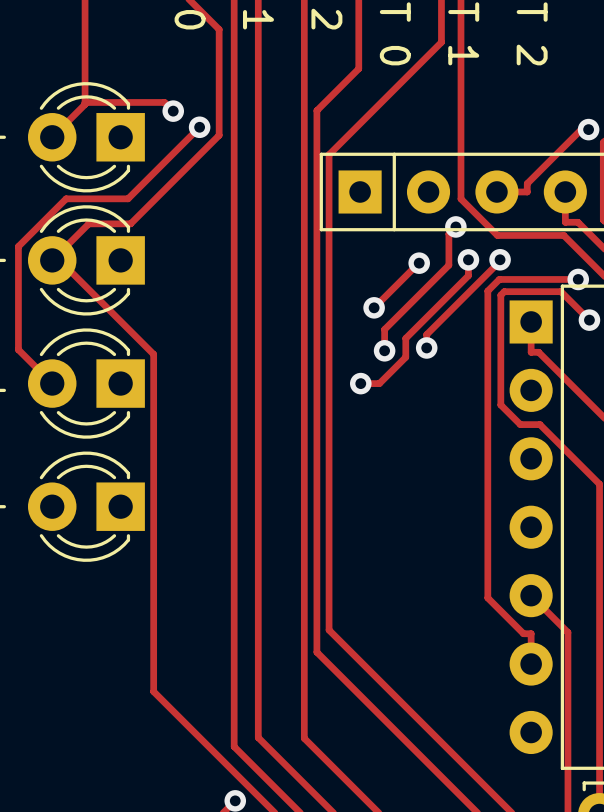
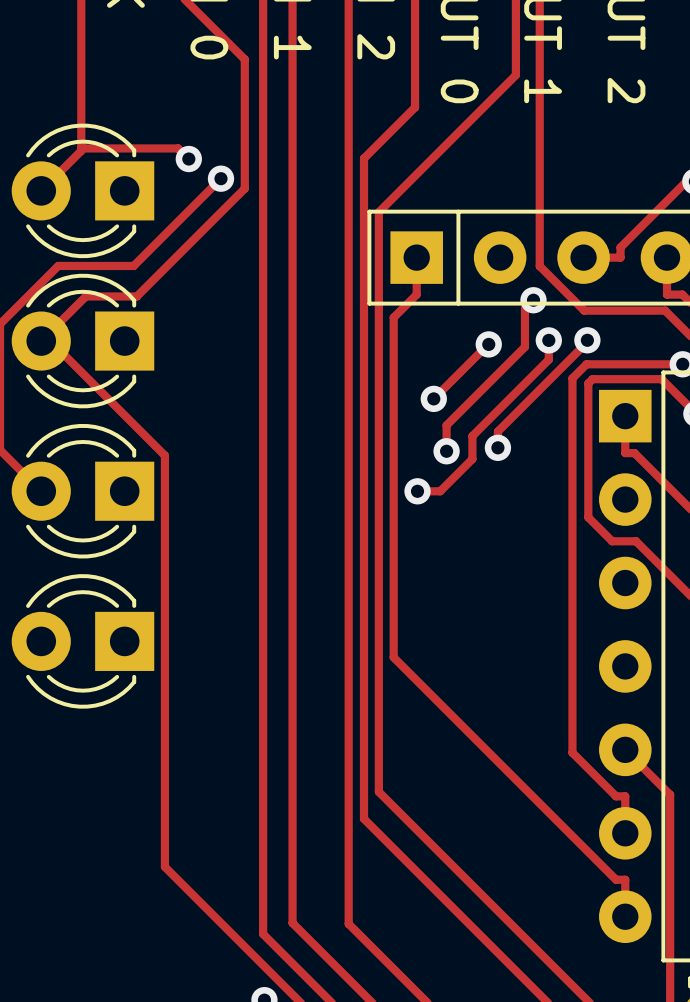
track: none -> (416, 257) (416, 294) (393, 317) (393, 657) (616, 879) (625, 879) (625, 916)

